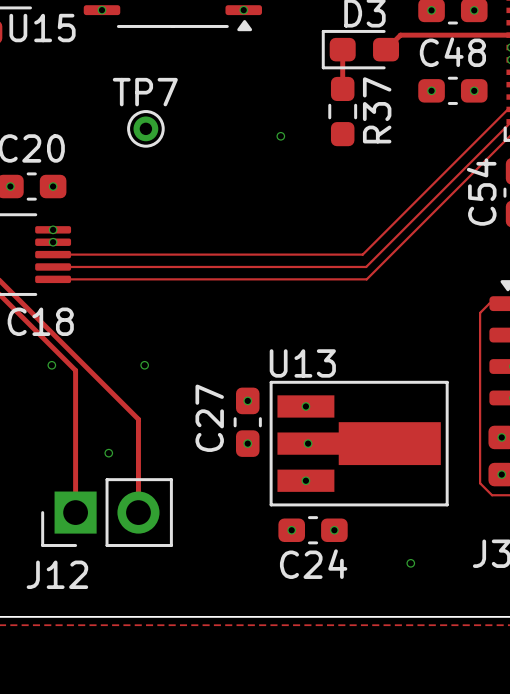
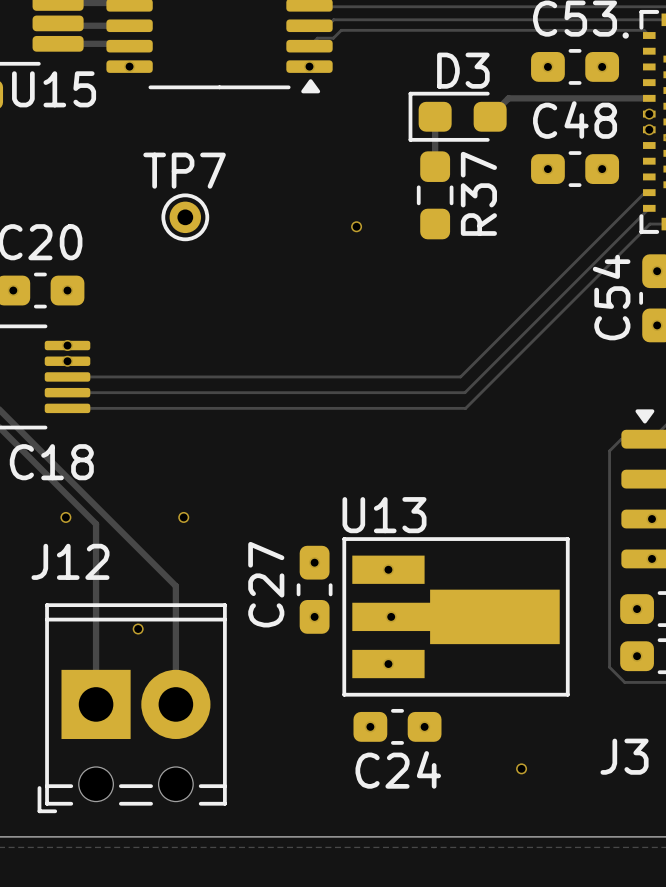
J12 footprint: [41, 478, 173, 547] -> [37, 603, 227, 814]
J12 name position: J12 (57, 574) -> J12 (70, 561)

